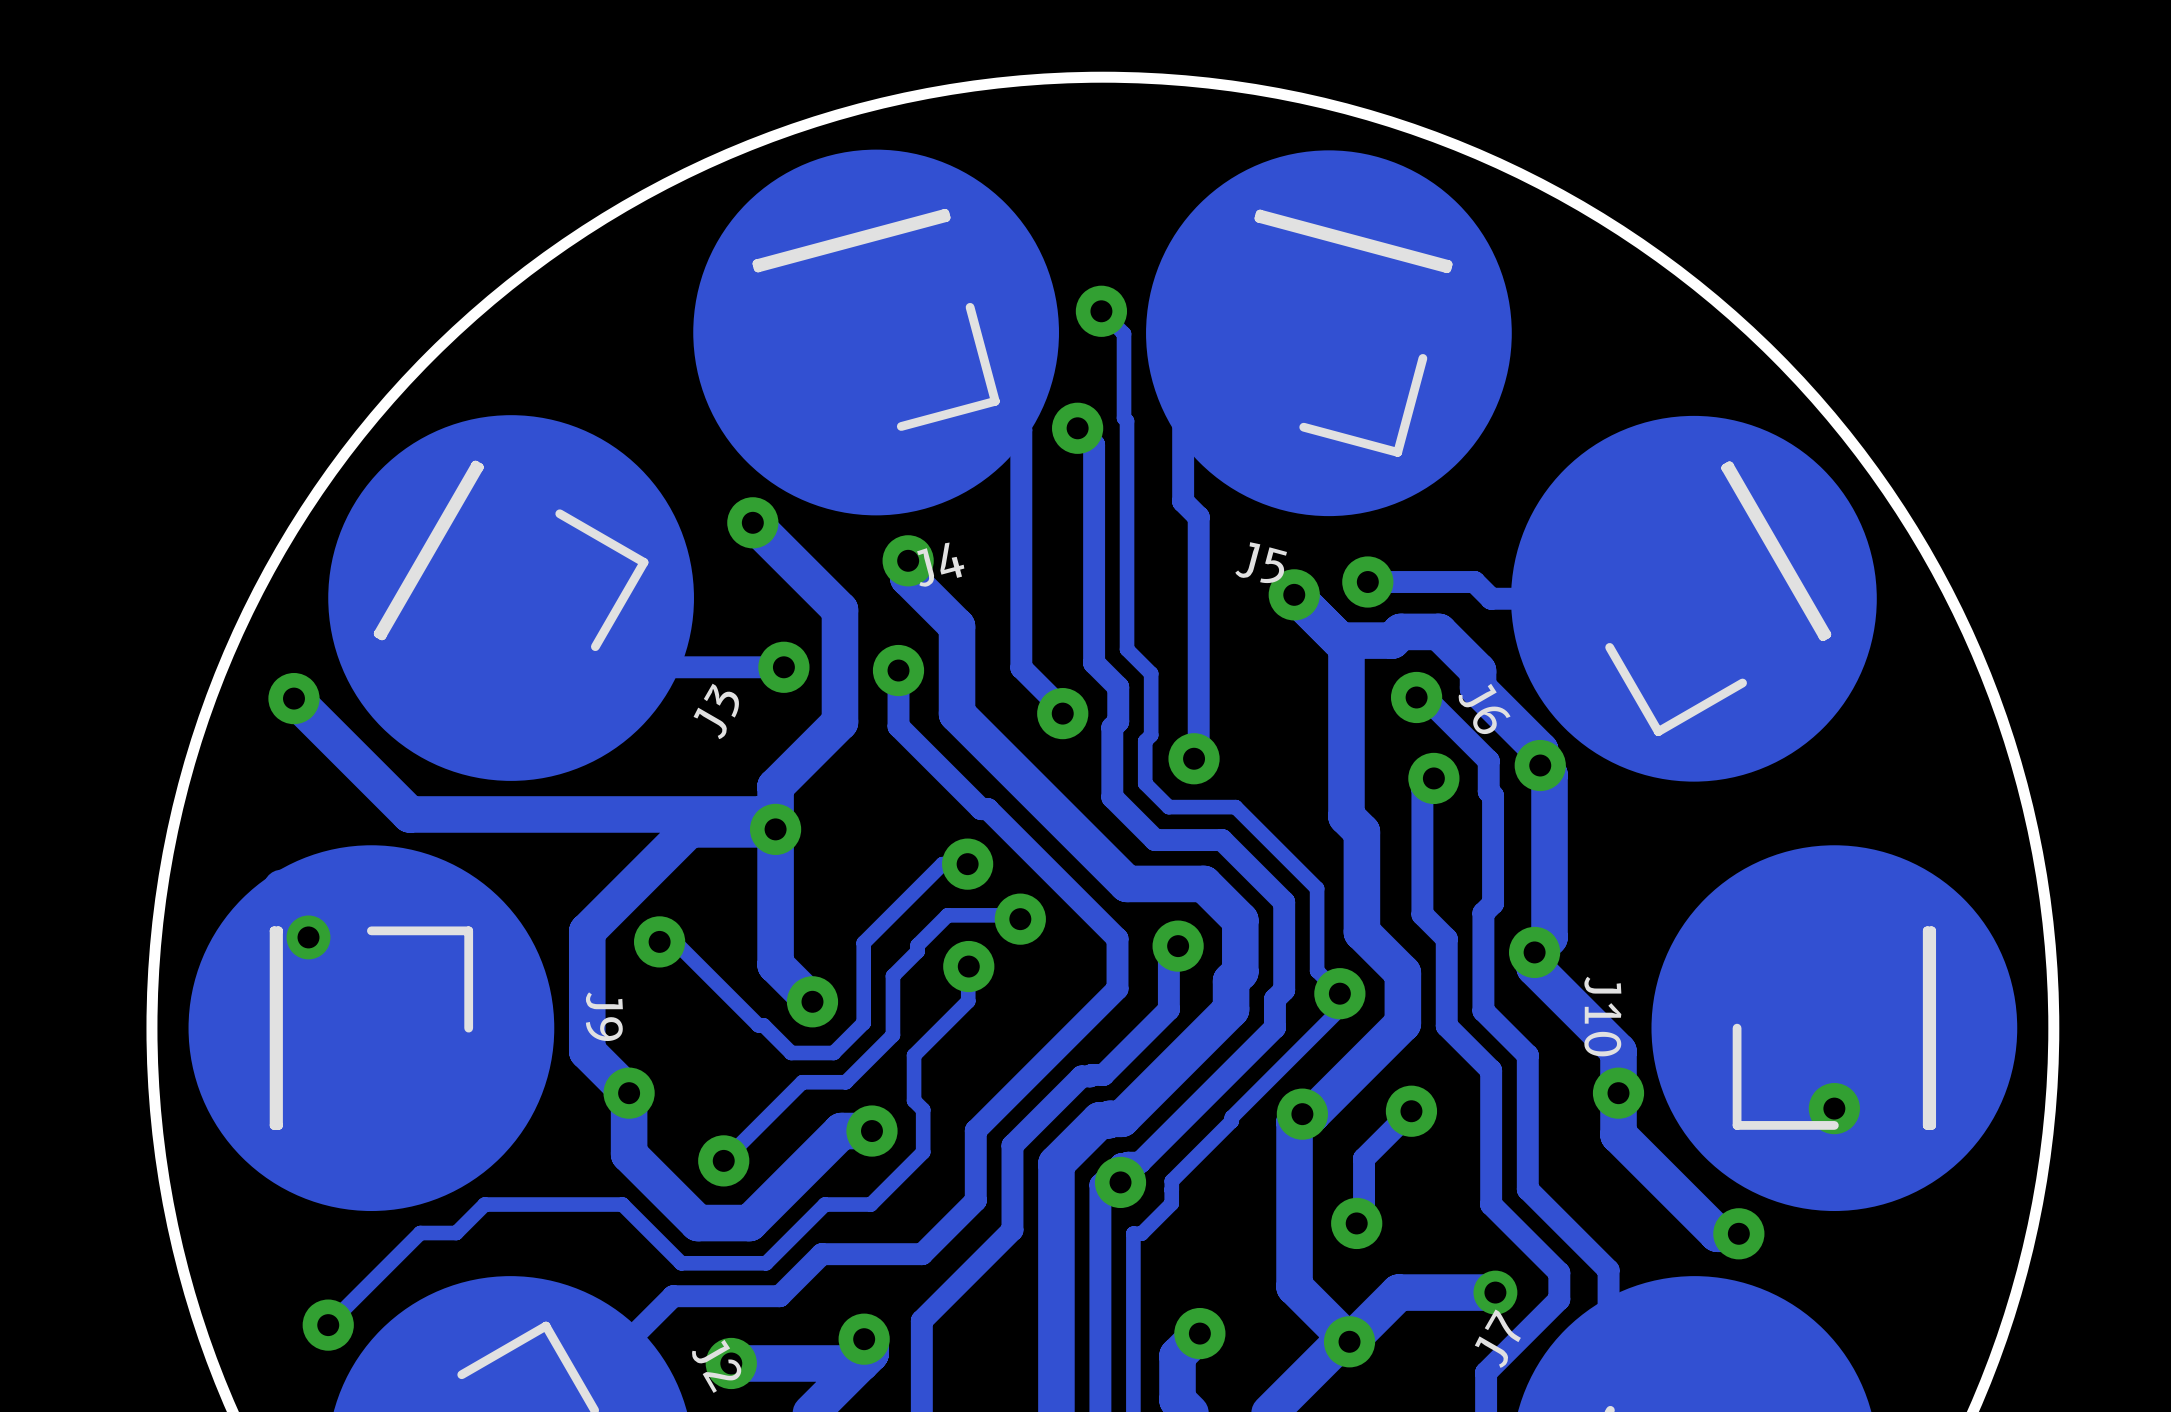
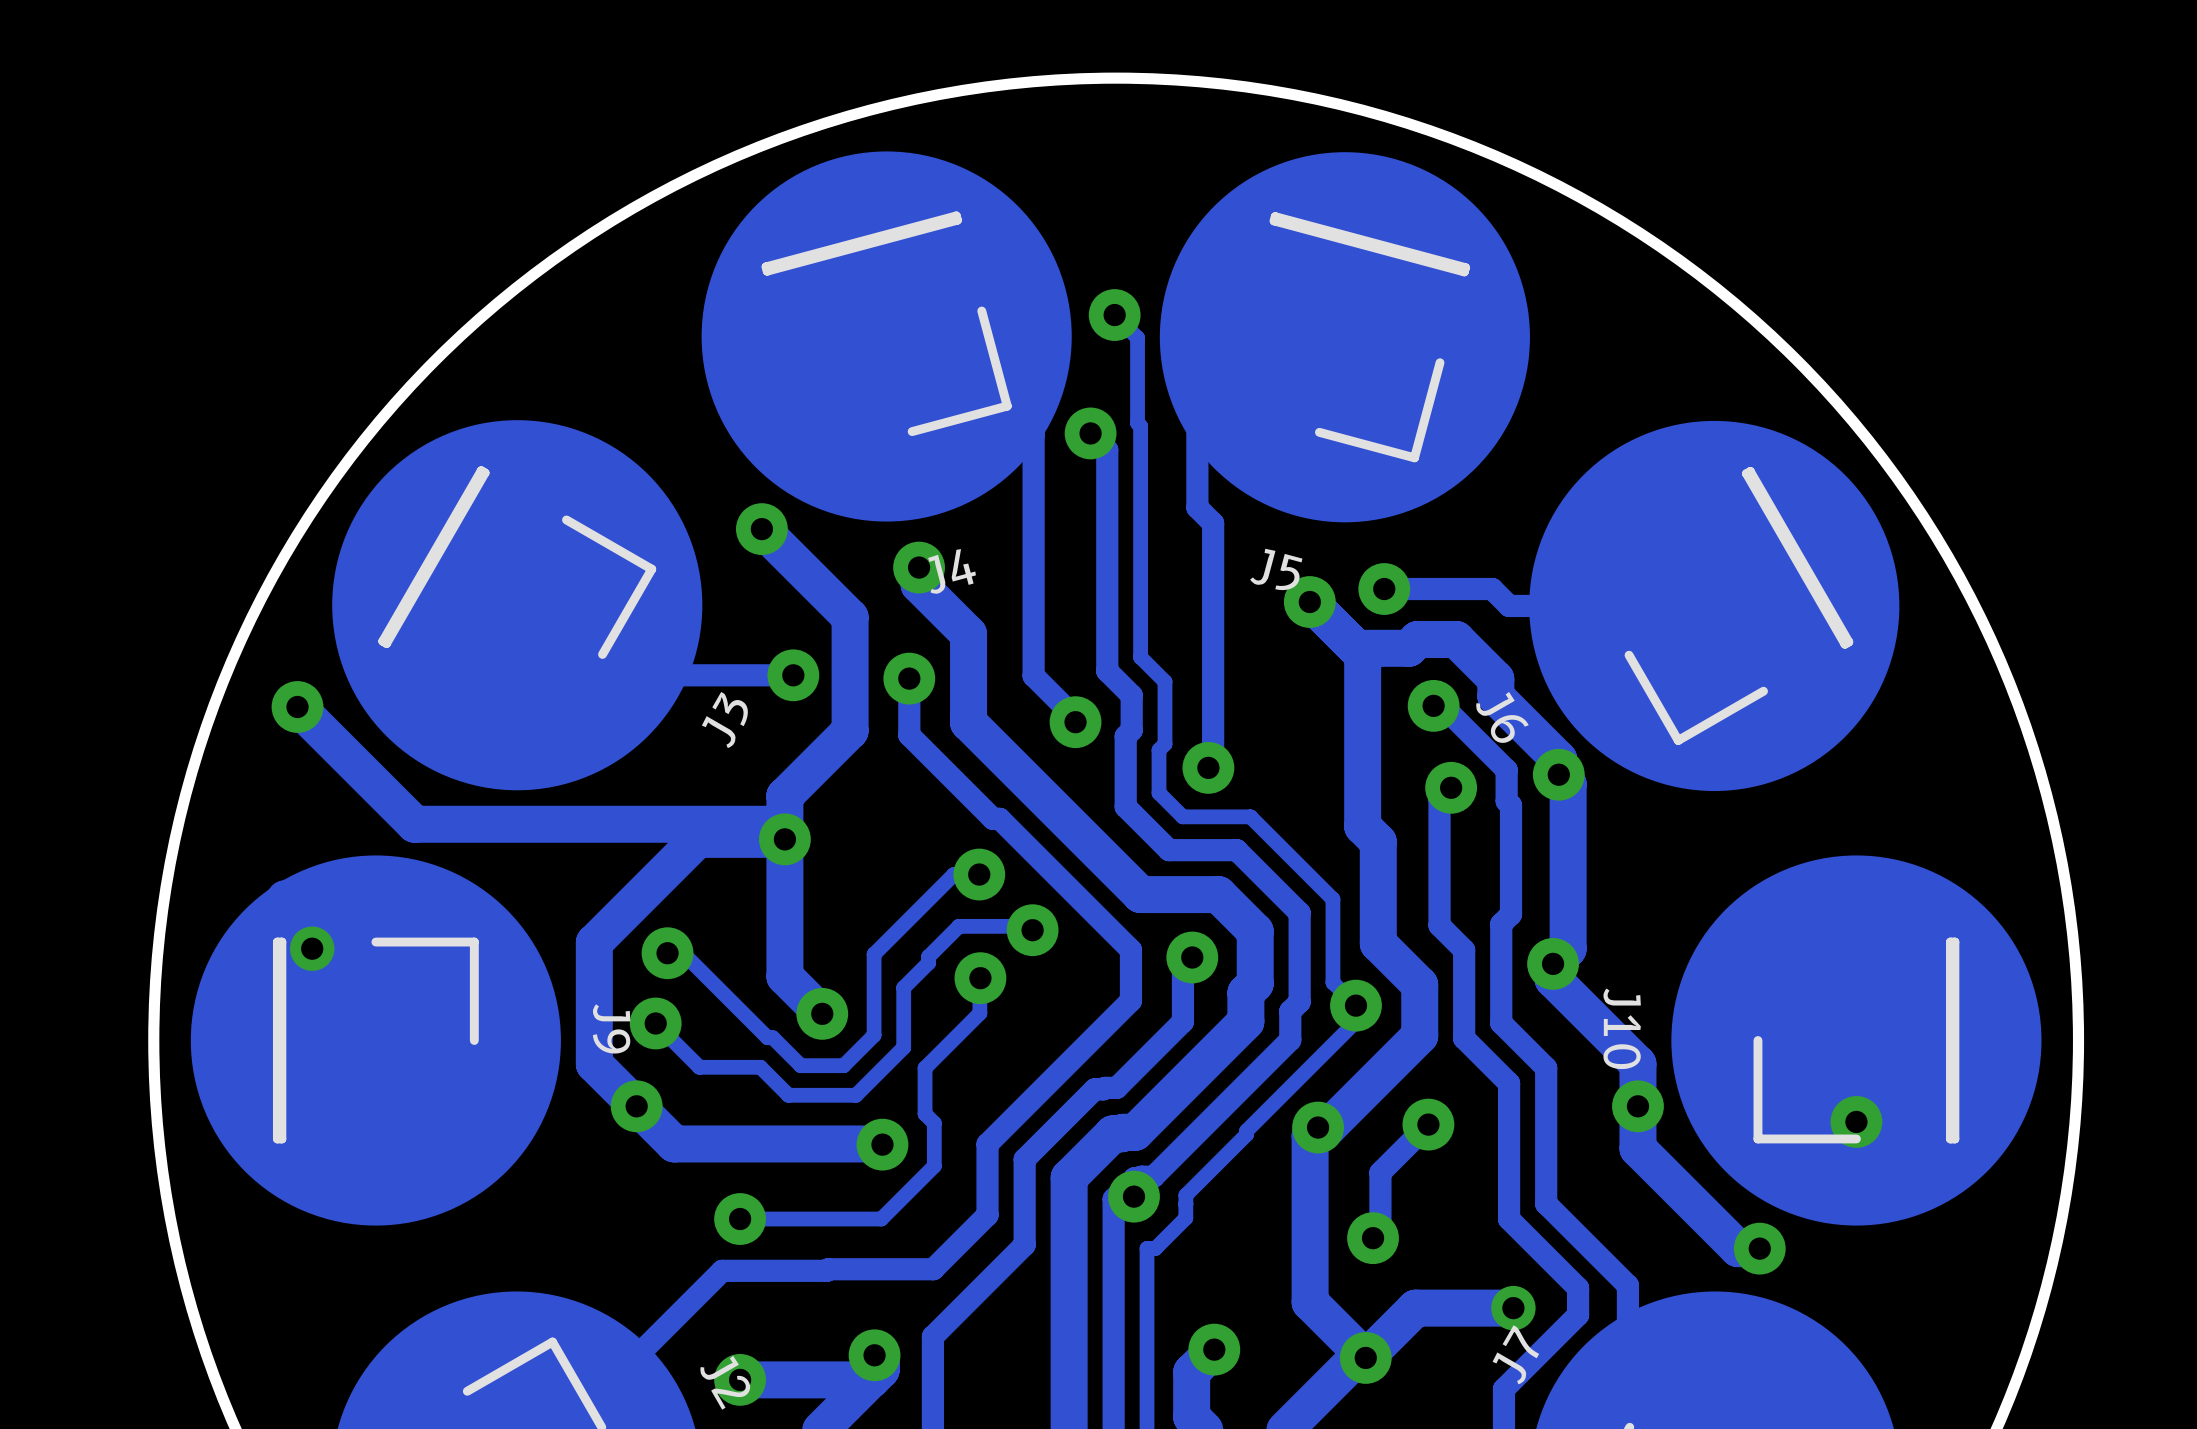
via: none -> (655, 1023)
track: (802, 1082) (723, 1160) -> (812, 1095) (788, 1095) (760, 1067) (699, 1067) (655, 1023)
track: (629, 1093) (629, 1154) (697, 1223) (749, 1223) (841, 1131) (871, 1131) -> (636, 1106) (674, 1143) (881, 1143)
via position: (723, 1160) -> (740, 1219)
track: (824, 1204) (766, 1263) (681, 1263) (622, 1204) (484, 1204) (456, 1233) (420, 1233) (328, 1325) -> (834, 1219) (740, 1219)
track: (821, 1254) (779, 1296) (673, 1296) -> (831, 1269) (826, 1270) (722, 1270) (681, 1311)
via: (328, 1325) -> none

